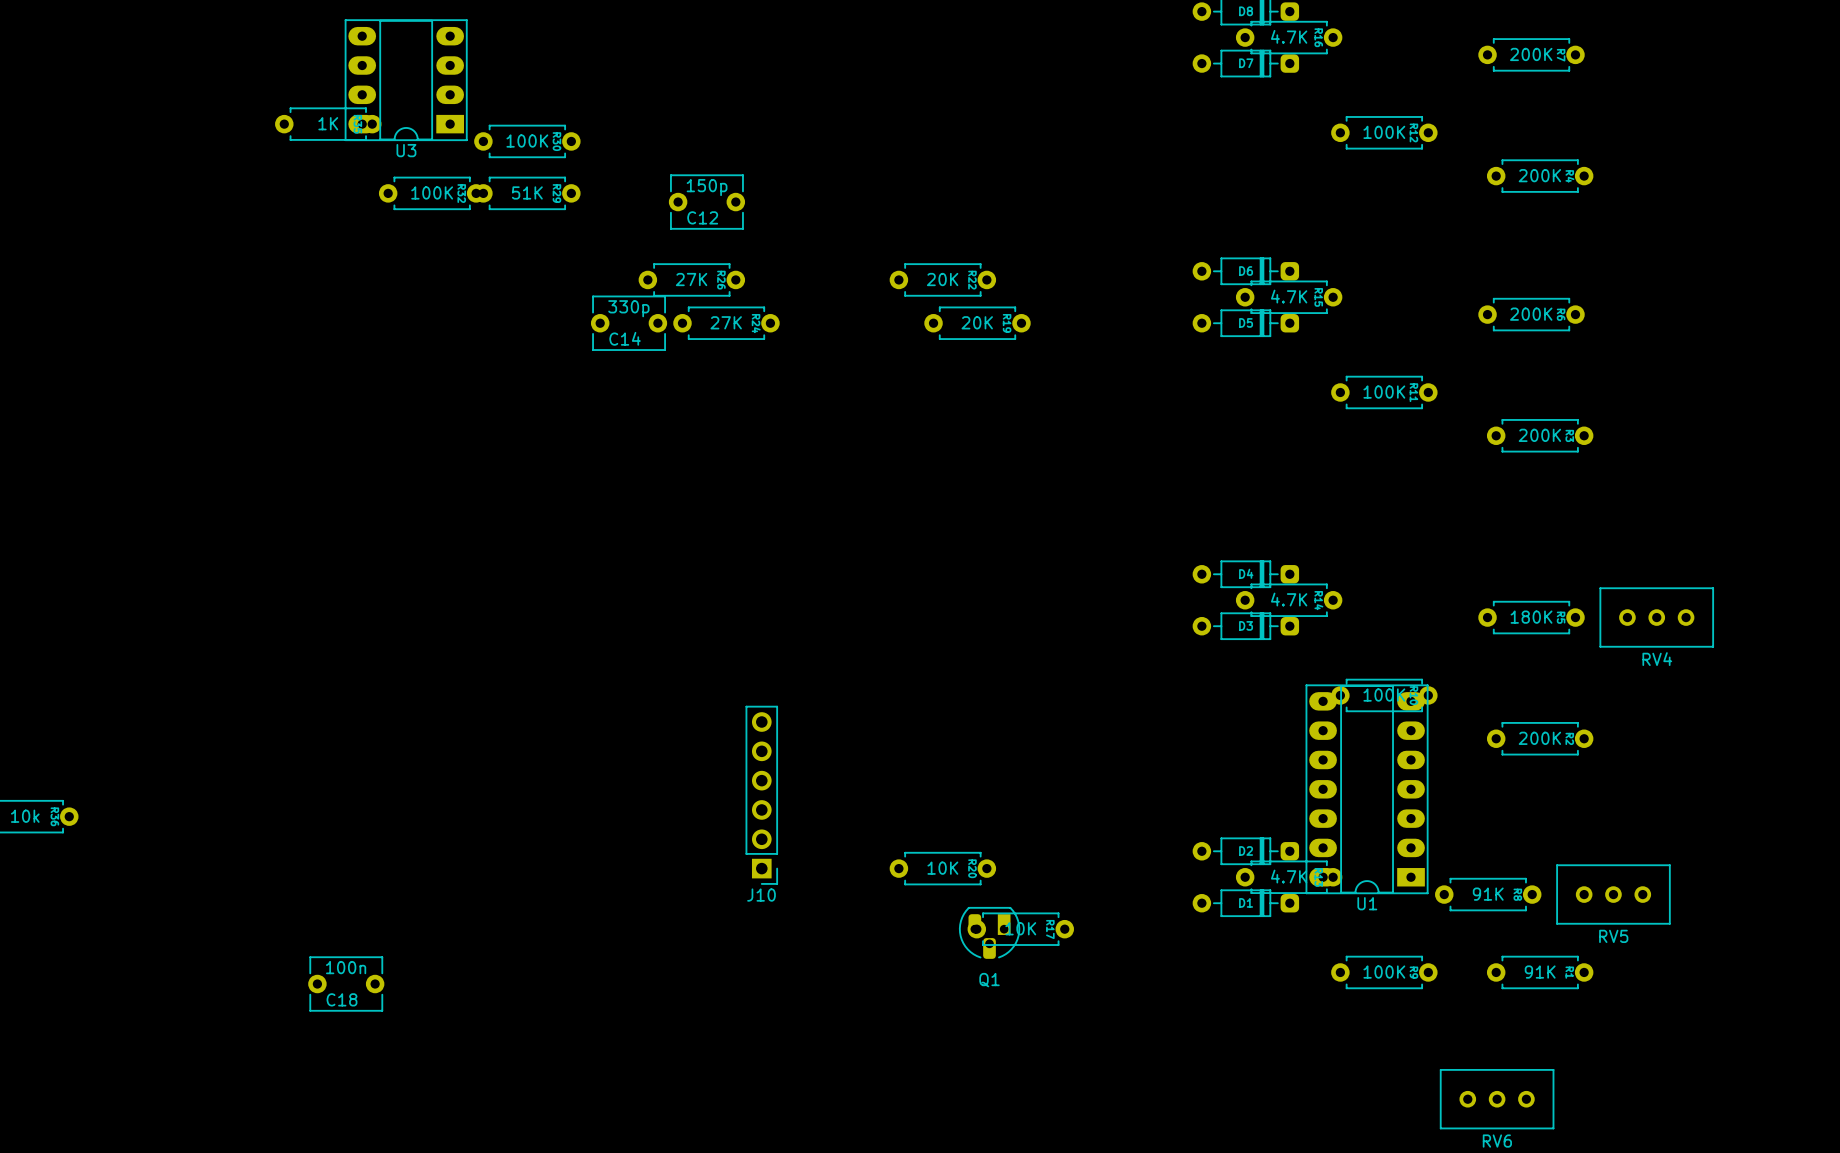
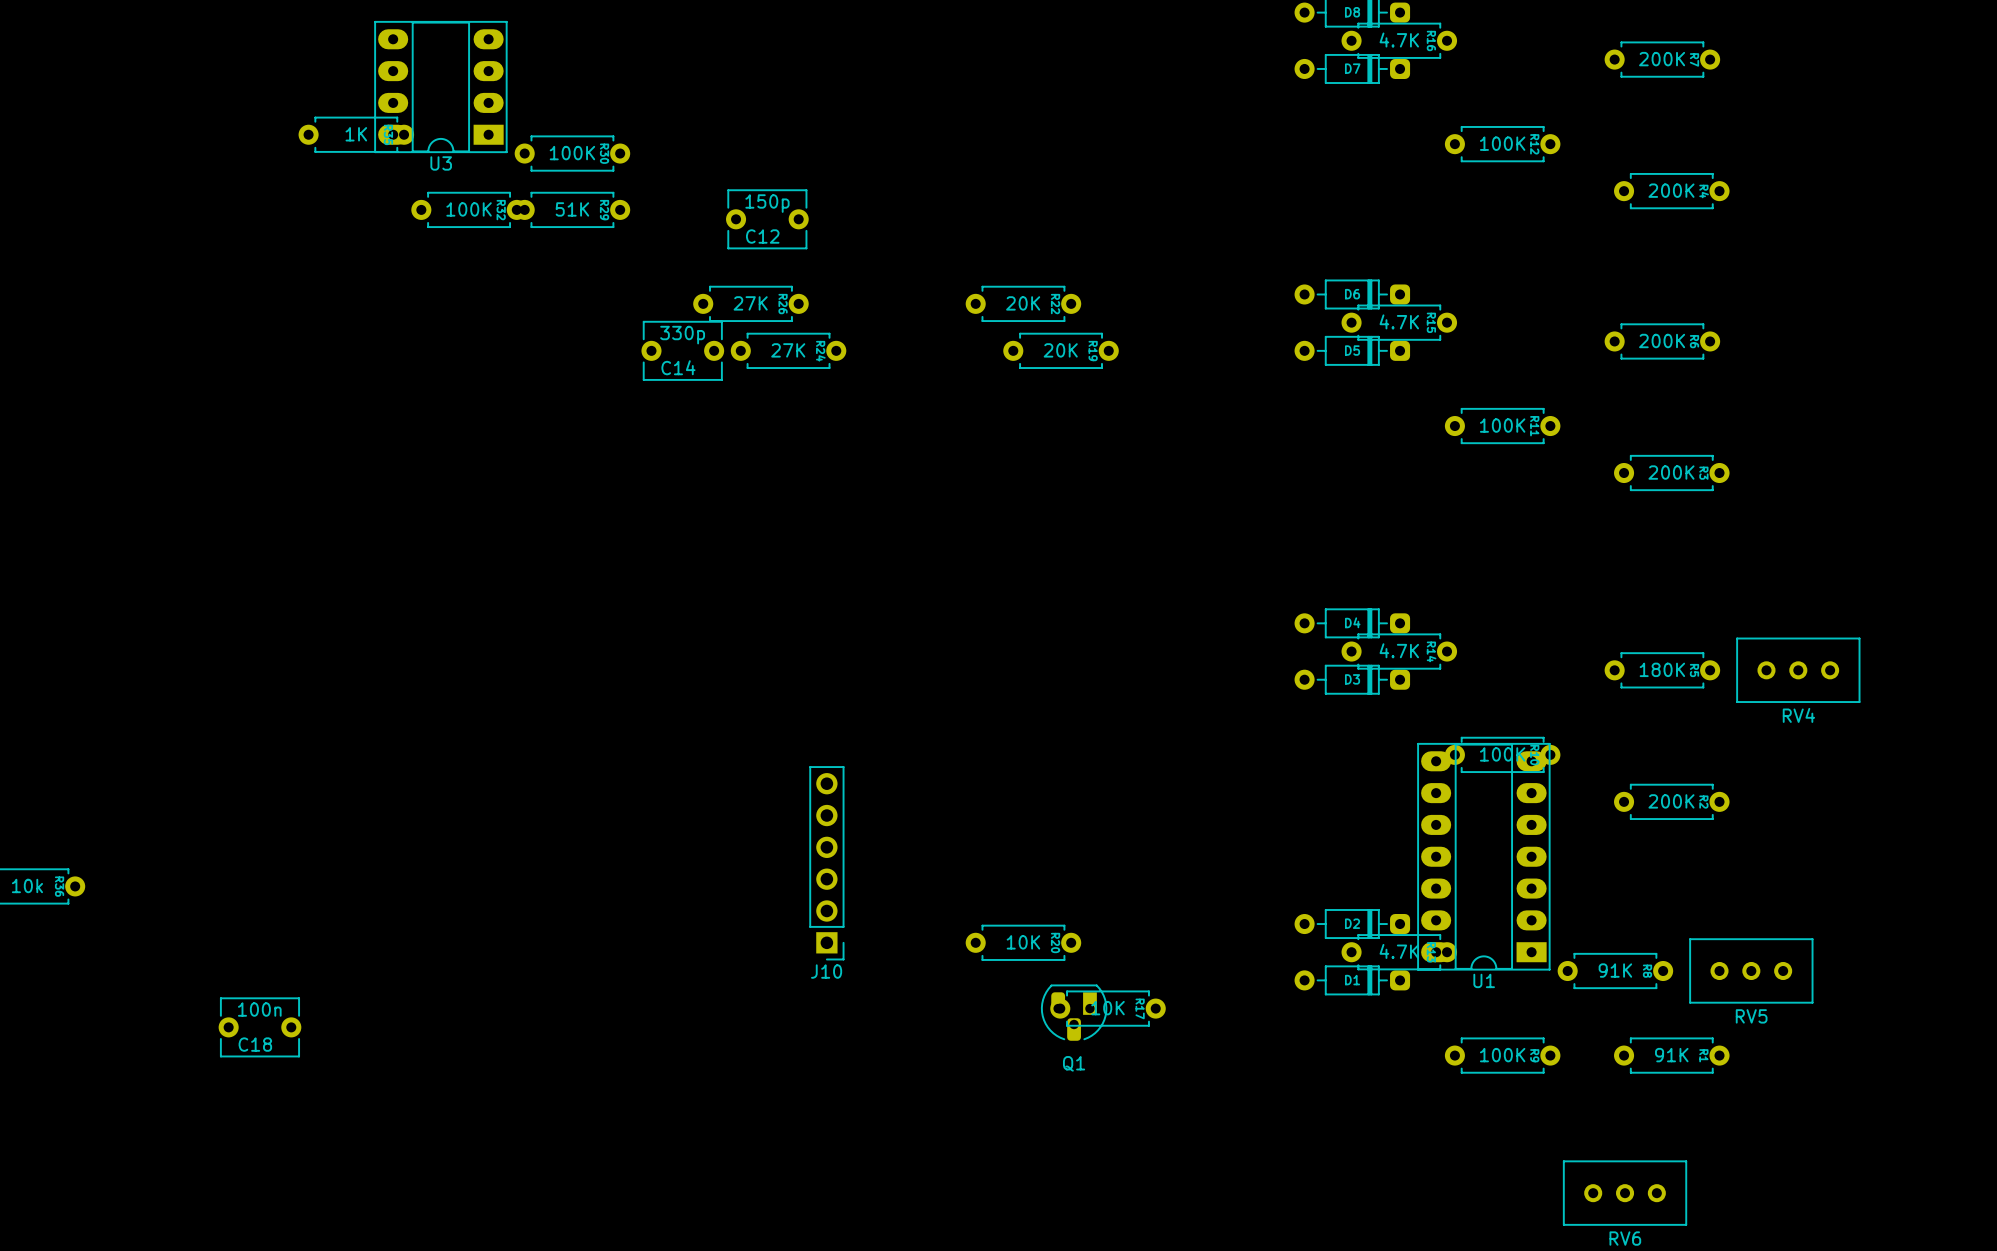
C18 position: (346, 984) -> (259, 1027)

